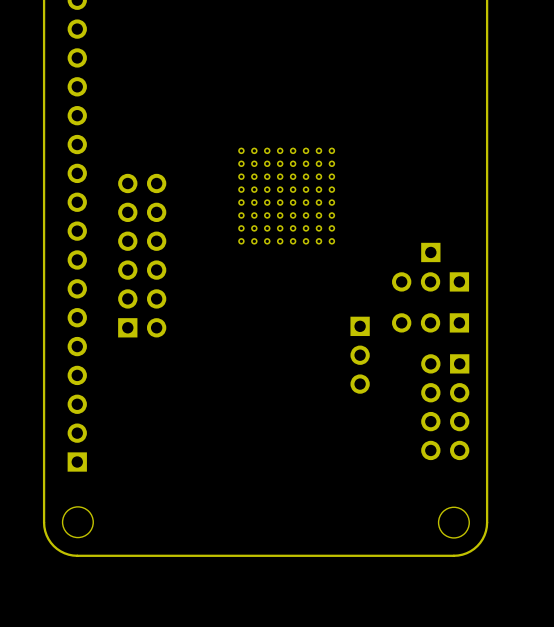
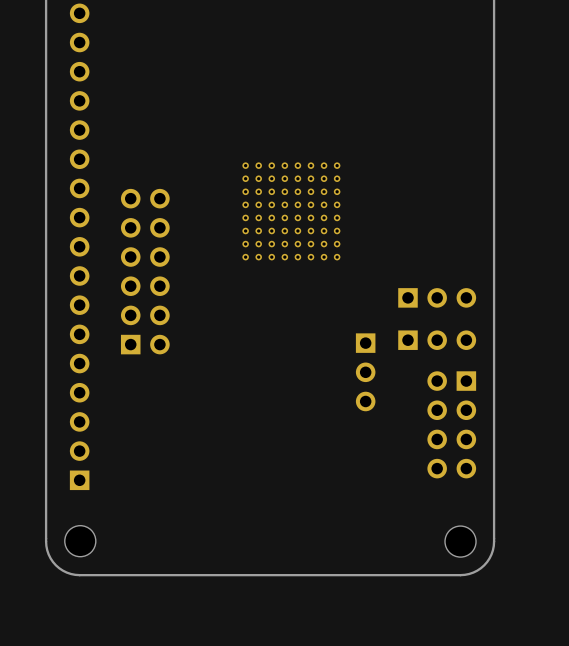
part: (430, 252) -> none
part rotation: 0° (430, 281) -> 180° (437, 297)
part rotation: 0° (430, 322) -> 180° (437, 340)

